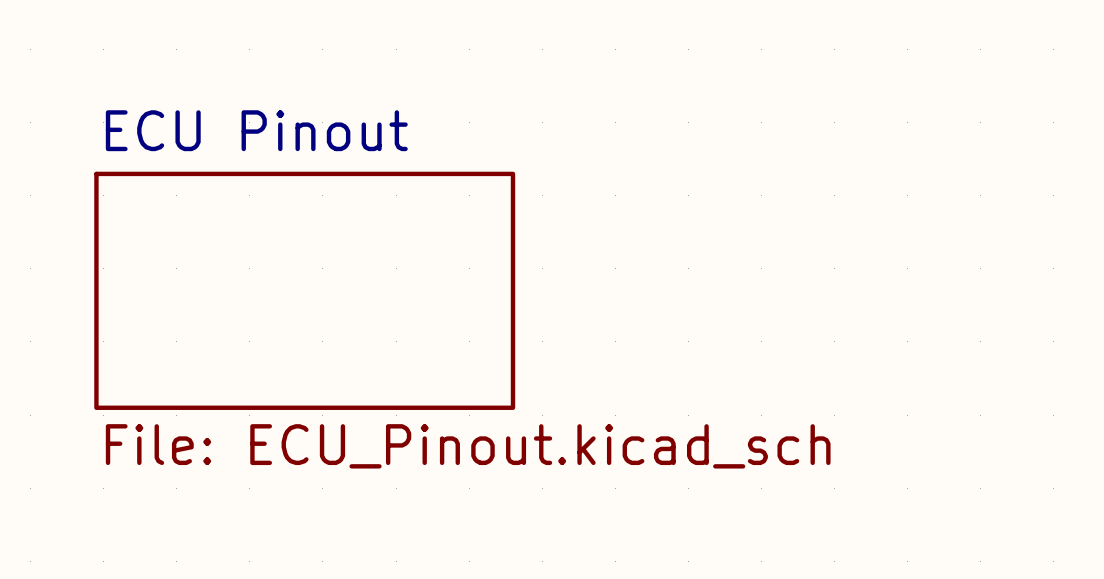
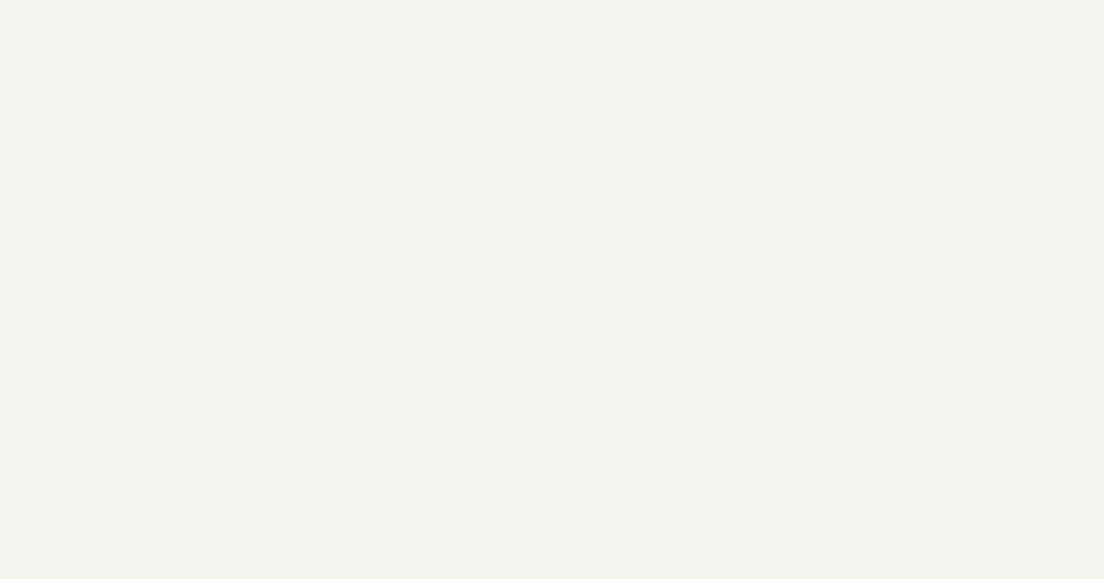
sheet ECU Pinout: File: ECU_Pinout.kicad_sch (304, 290) -> none

